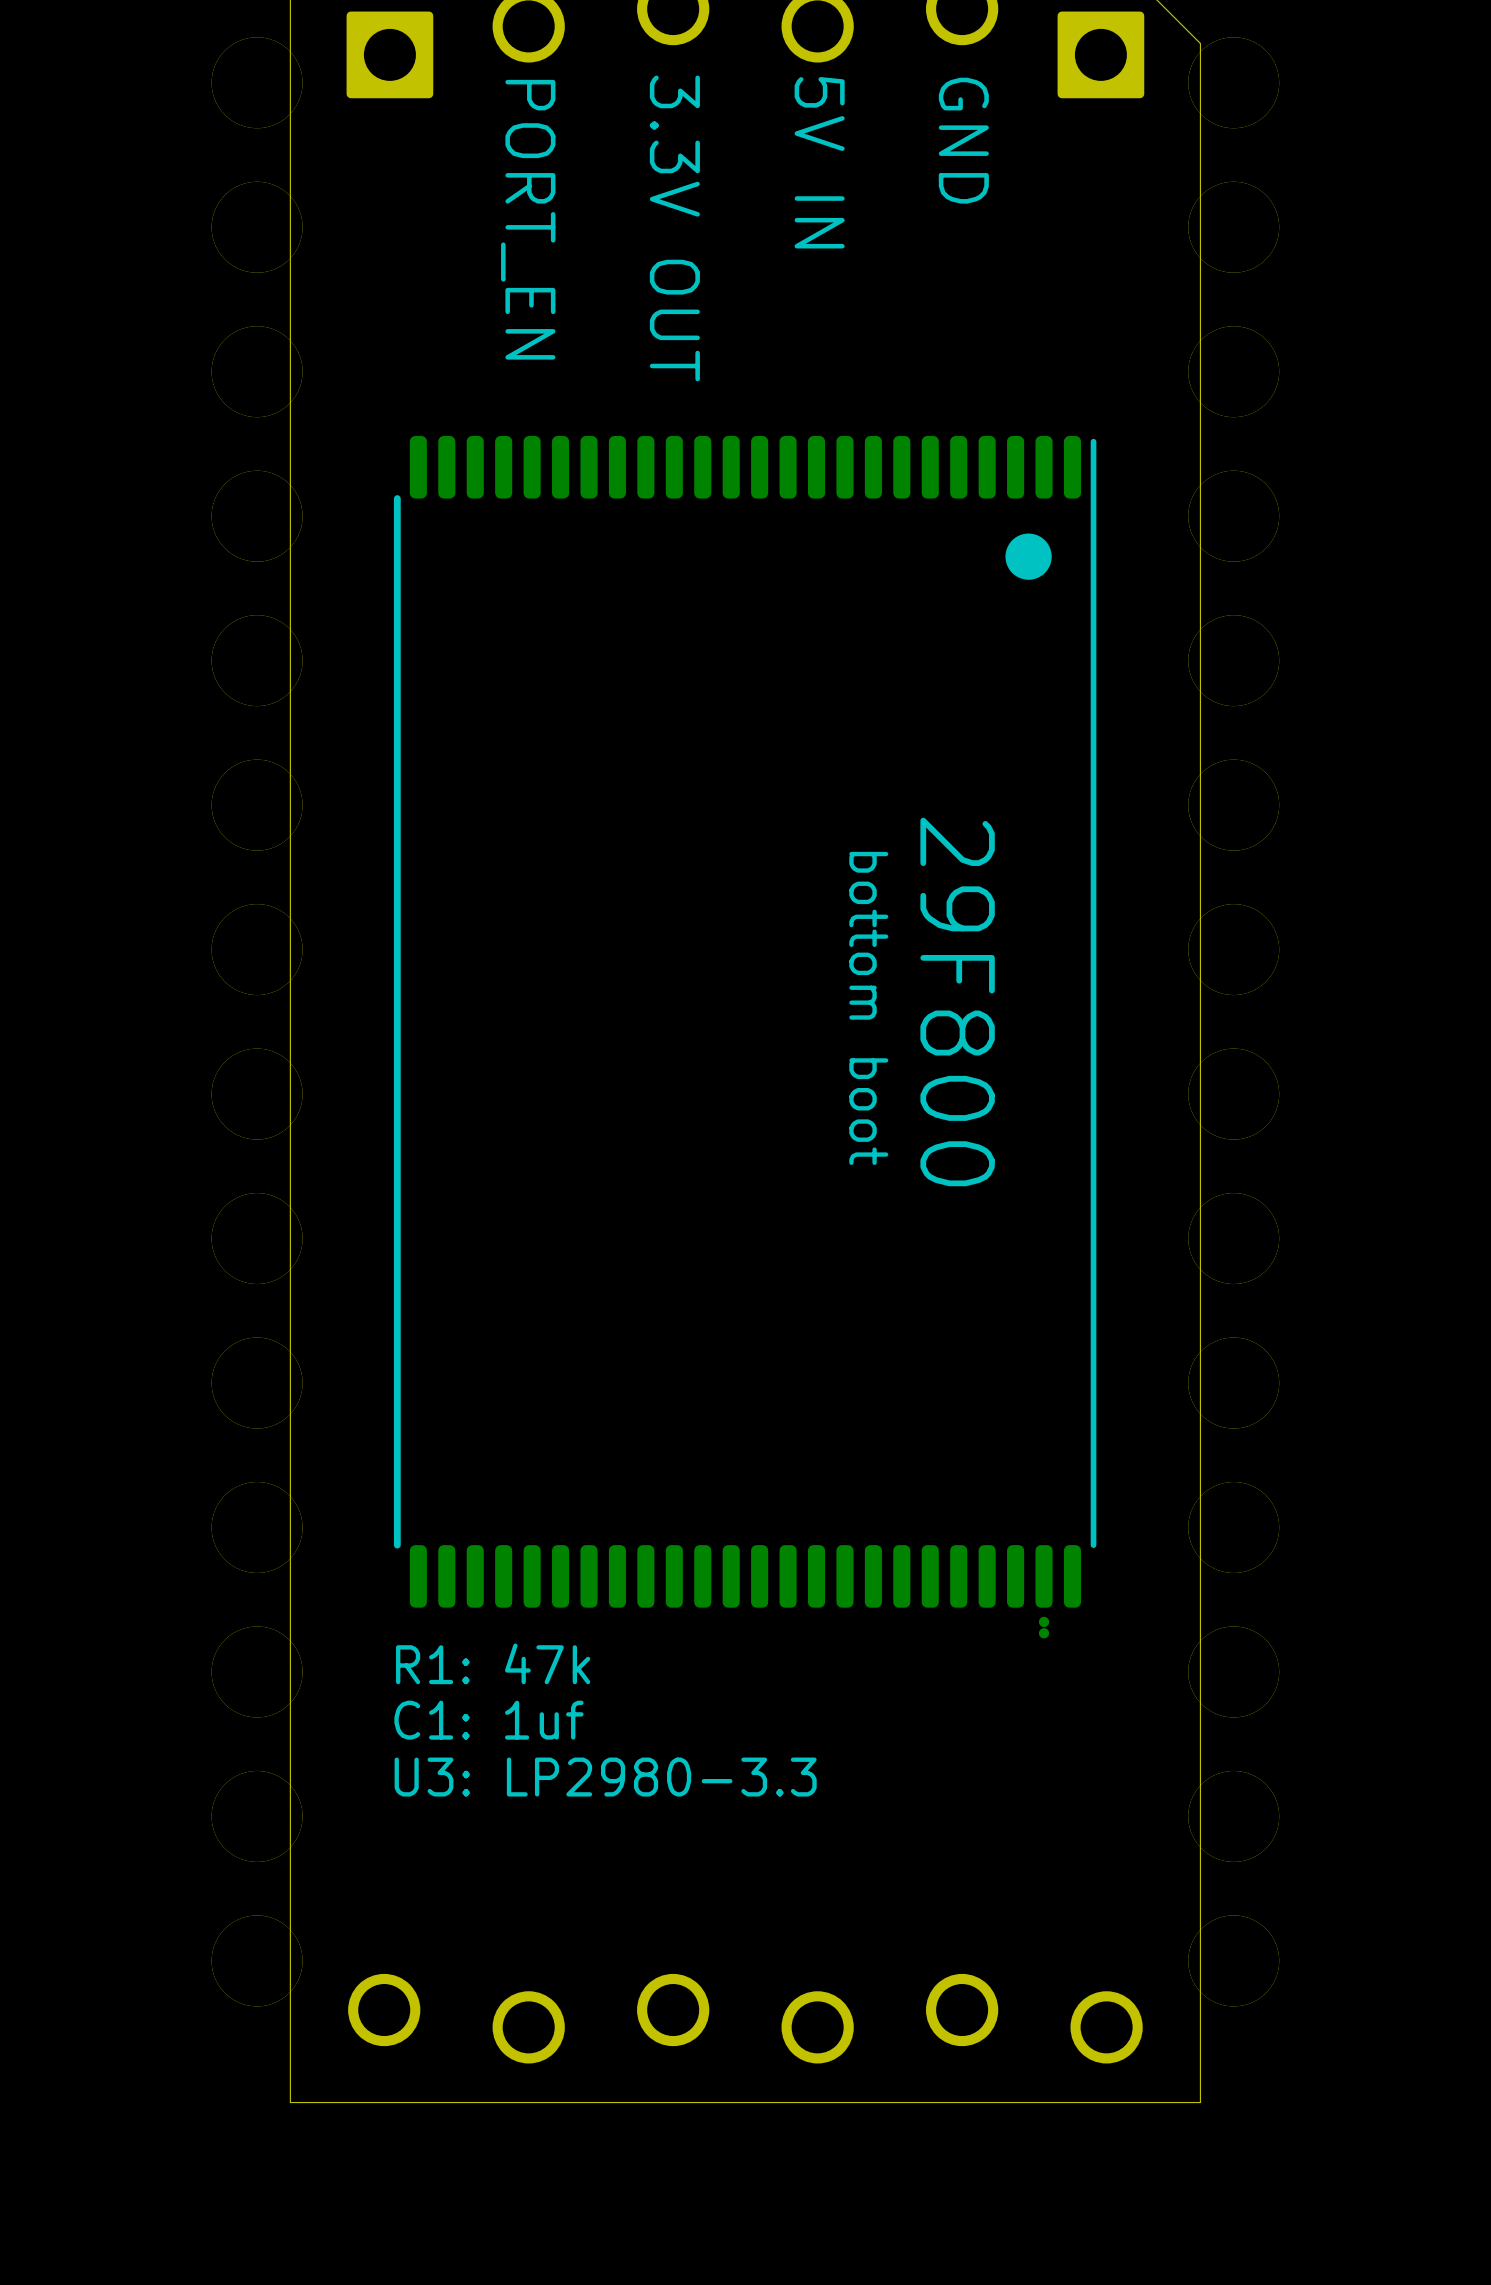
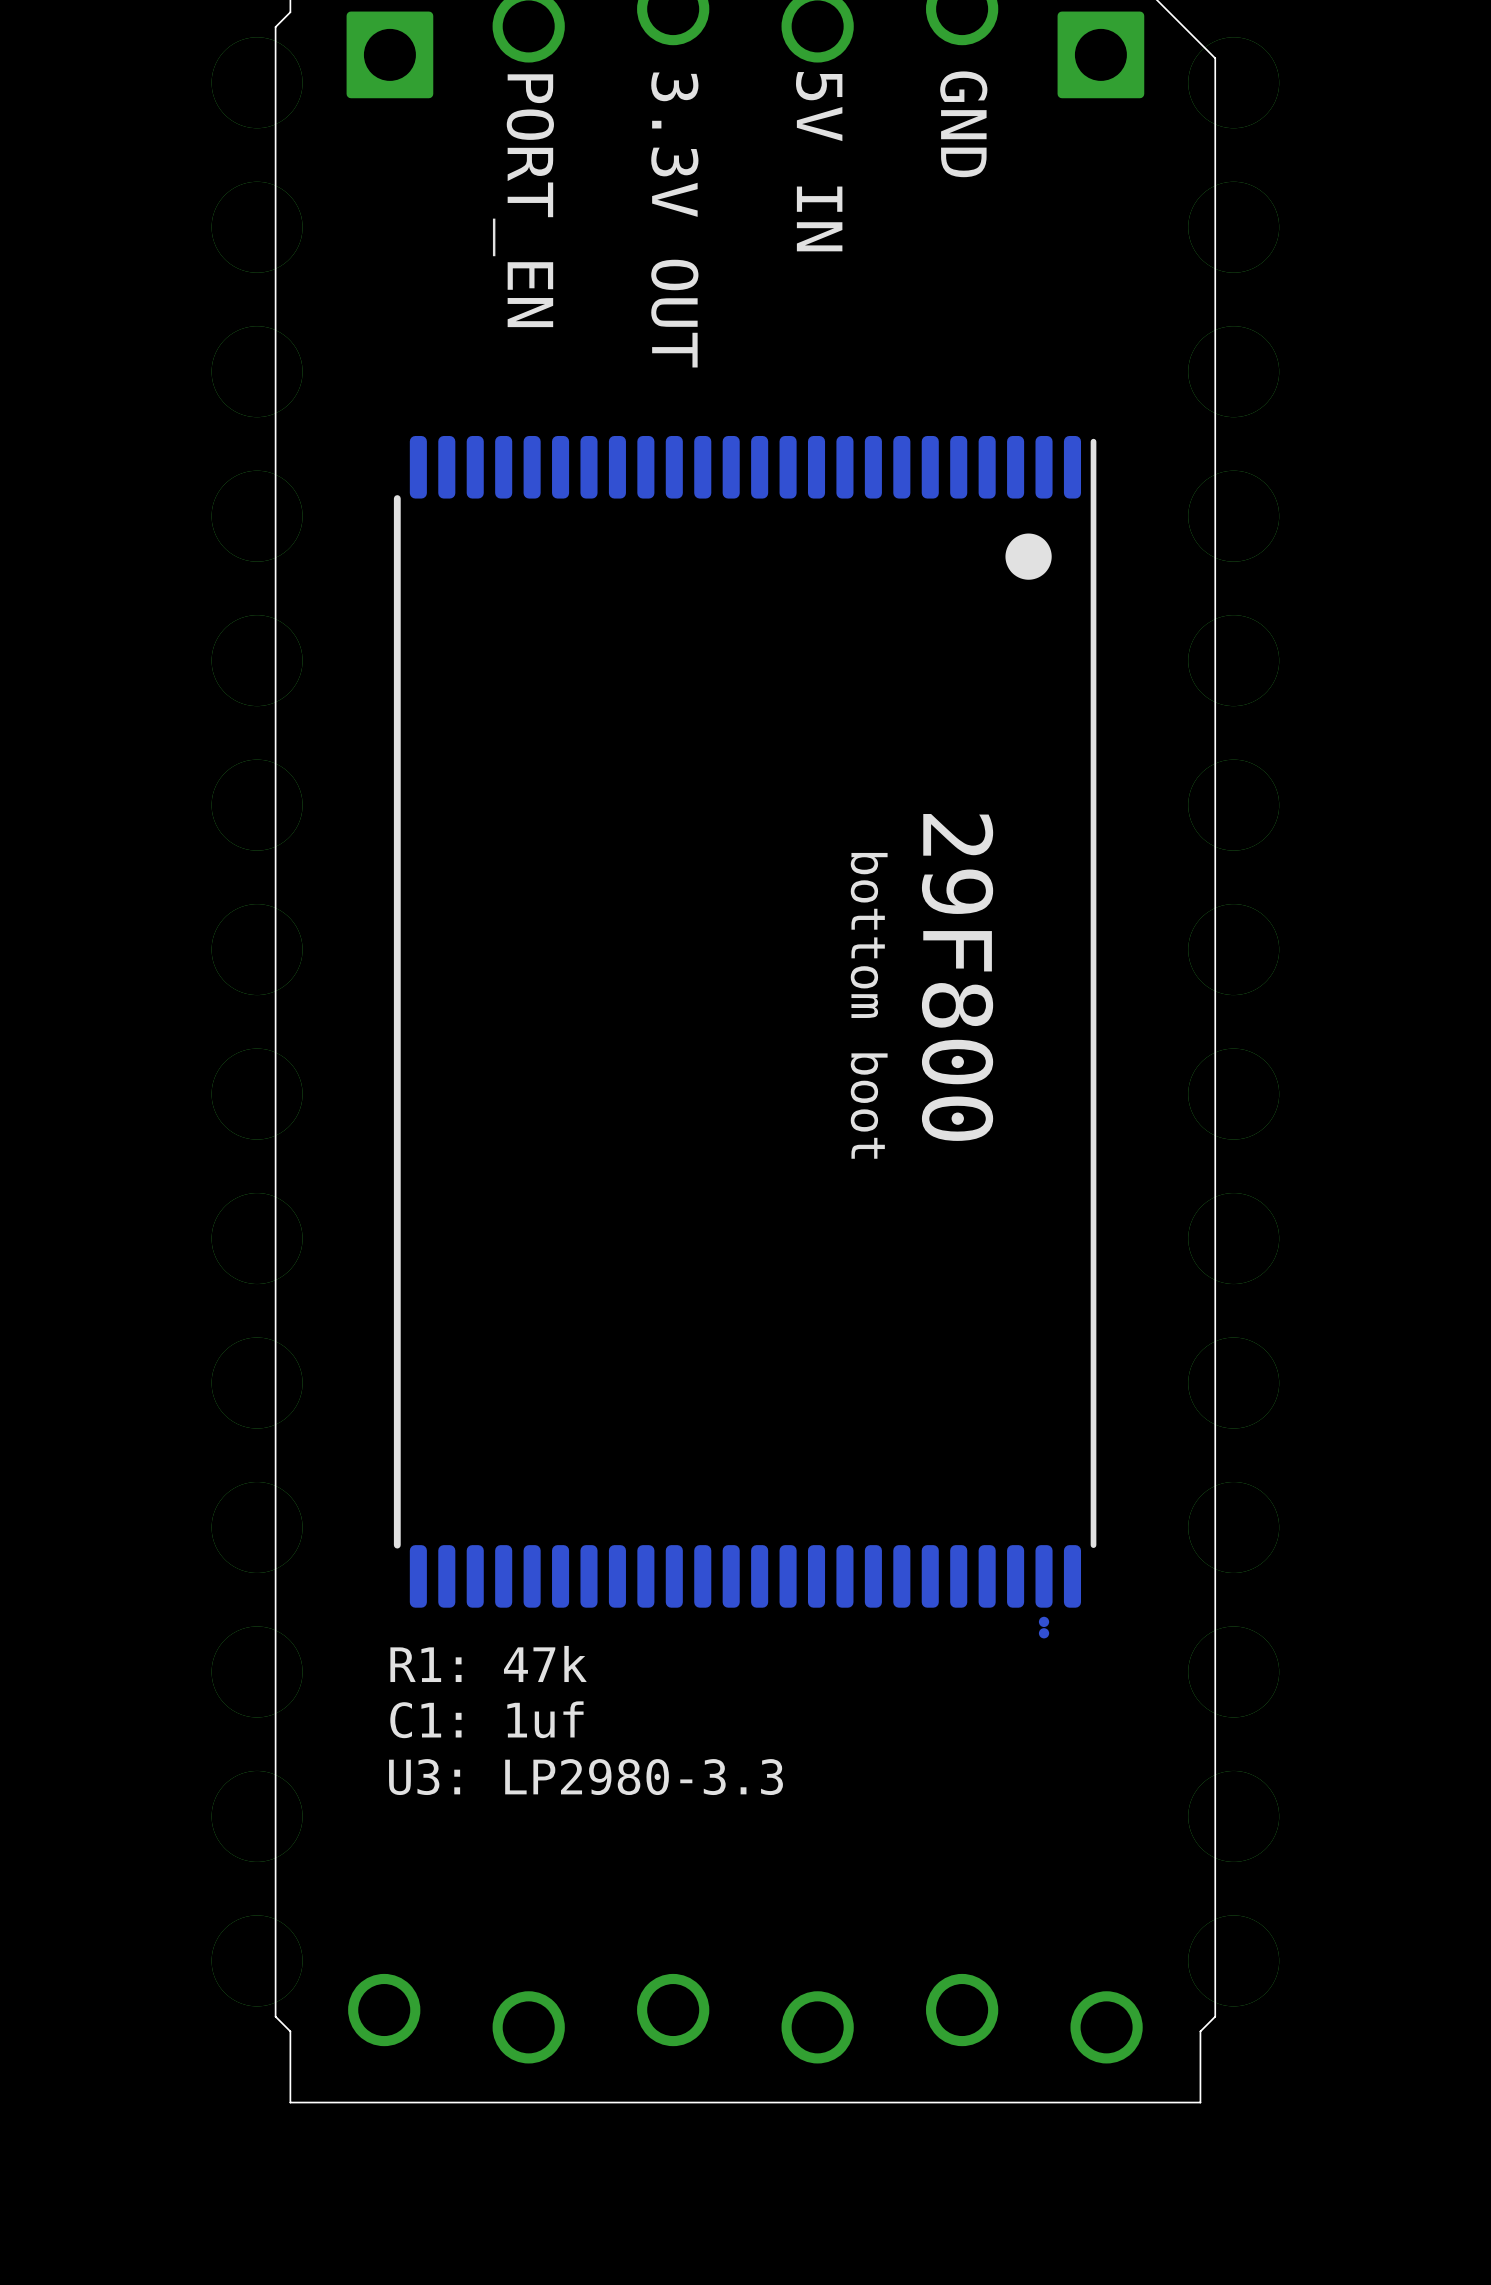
board edge: (290, 12) (290, 2031) -> (290, 12) (275, 27) (275, 2016) (290, 2031)
board edge: (1200, 43) (1200, 2031) -> (1200, 43) (1215, 58) (1215, 2016) (1200, 2031)

